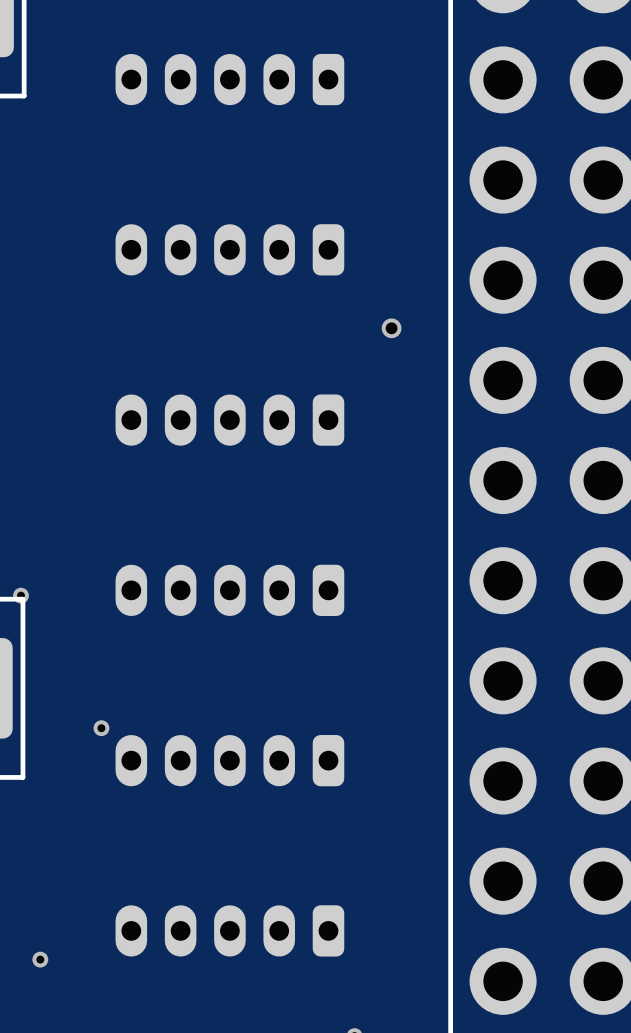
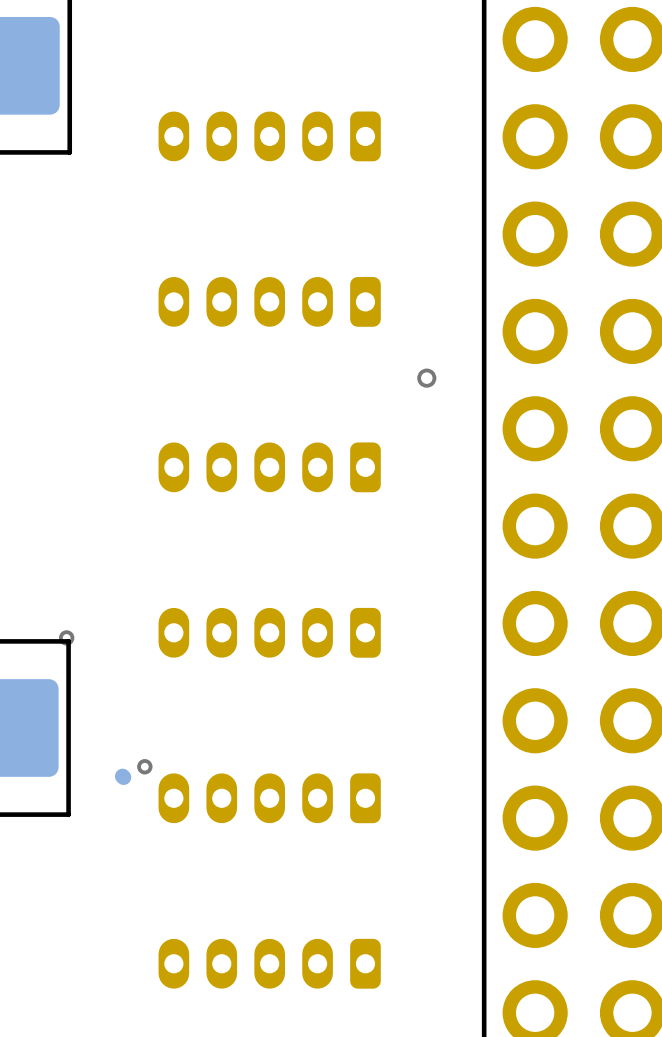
track: none -> (122, 776) (123, 777)
via: (40, 959) -> none

